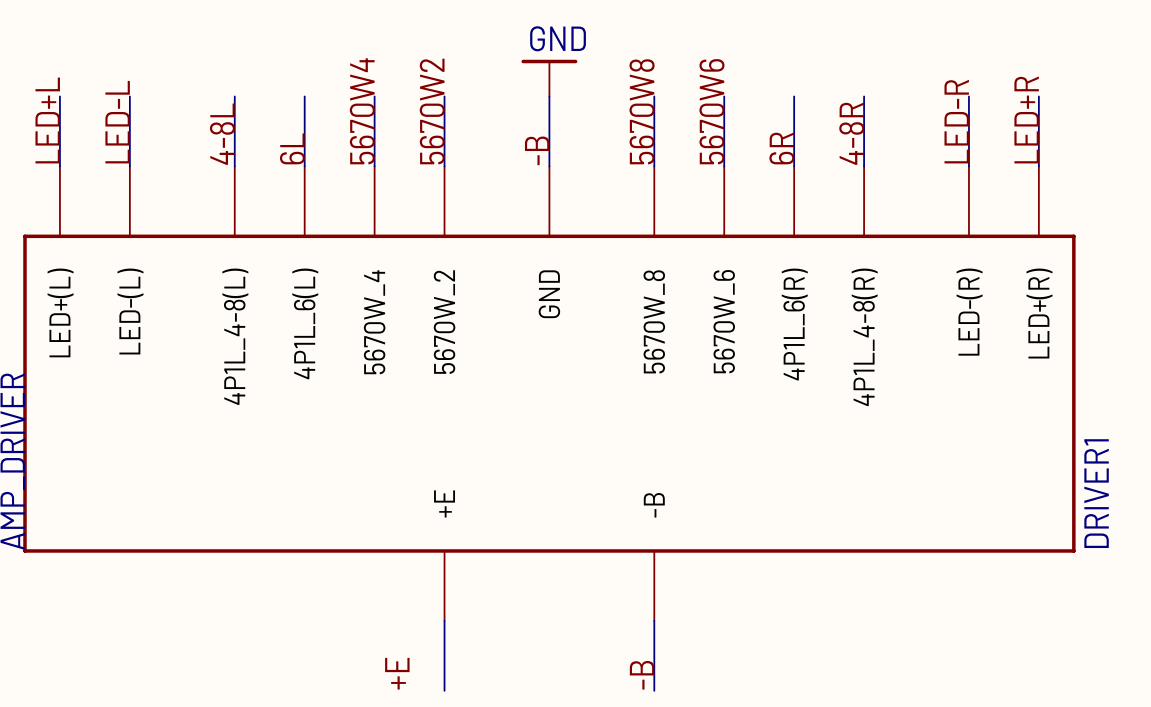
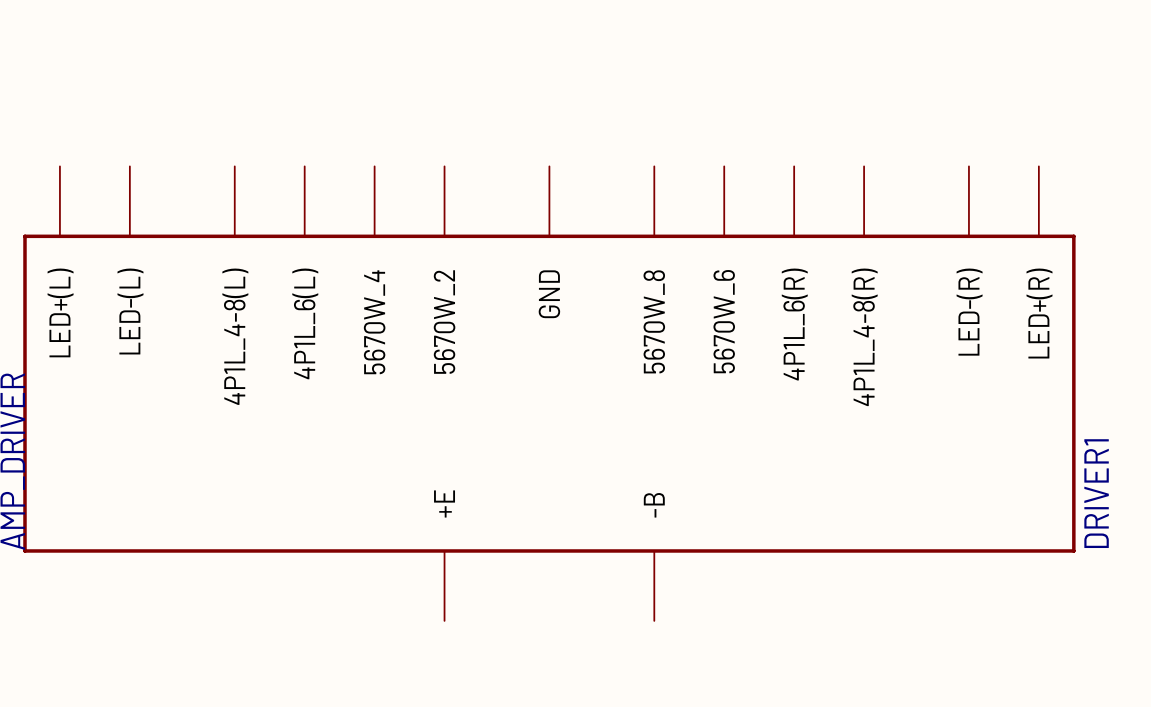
power symbol: GND (549, 78) -> none
wire: (59, 96) (59, 166) -> none
wire: (129, 96) (129, 166) -> none
wire: (234, 96) (234, 166) -> none
wire: (304, 96) (304, 166) -> none
wire: (374, 96) (374, 166) -> none
wire: (444, 96) (444, 166) -> none
wire: (549, 96) (549, 166) -> none
wire: (654, 96) (654, 166) -> none
wire: (724, 96) (724, 166) -> none
wire: (794, 96) (794, 166) -> none
wire: (864, 96) (864, 166) -> none
wire: (968, 96) (968, 166) -> none
wire: (1038, 96) (1038, 166) -> none
label: 5670W4 (362, 111) -> none
label: 5670W2 (432, 111) -> none
label: 5670W8 (642, 111) -> none
label: 5670W6 (712, 111) -> none
label: LED+L (47, 120) -> none
label: LED+R (1026, 120) -> none
label: LED-R (956, 121) -> none
label: LED-L (117, 122) -> none
label: 4-8R (851, 133) -> none
label: 4-8L (222, 134) -> none
label: 6L (292, 148) -> none
label: 6R (781, 148) -> none
label: -B (537, 150) -> none
wire: (444, 620) (444, 690) -> none
wire: (654, 620) (654, 690) -> none
label: +E (397, 673) -> none
label: -B (642, 675) -> none

